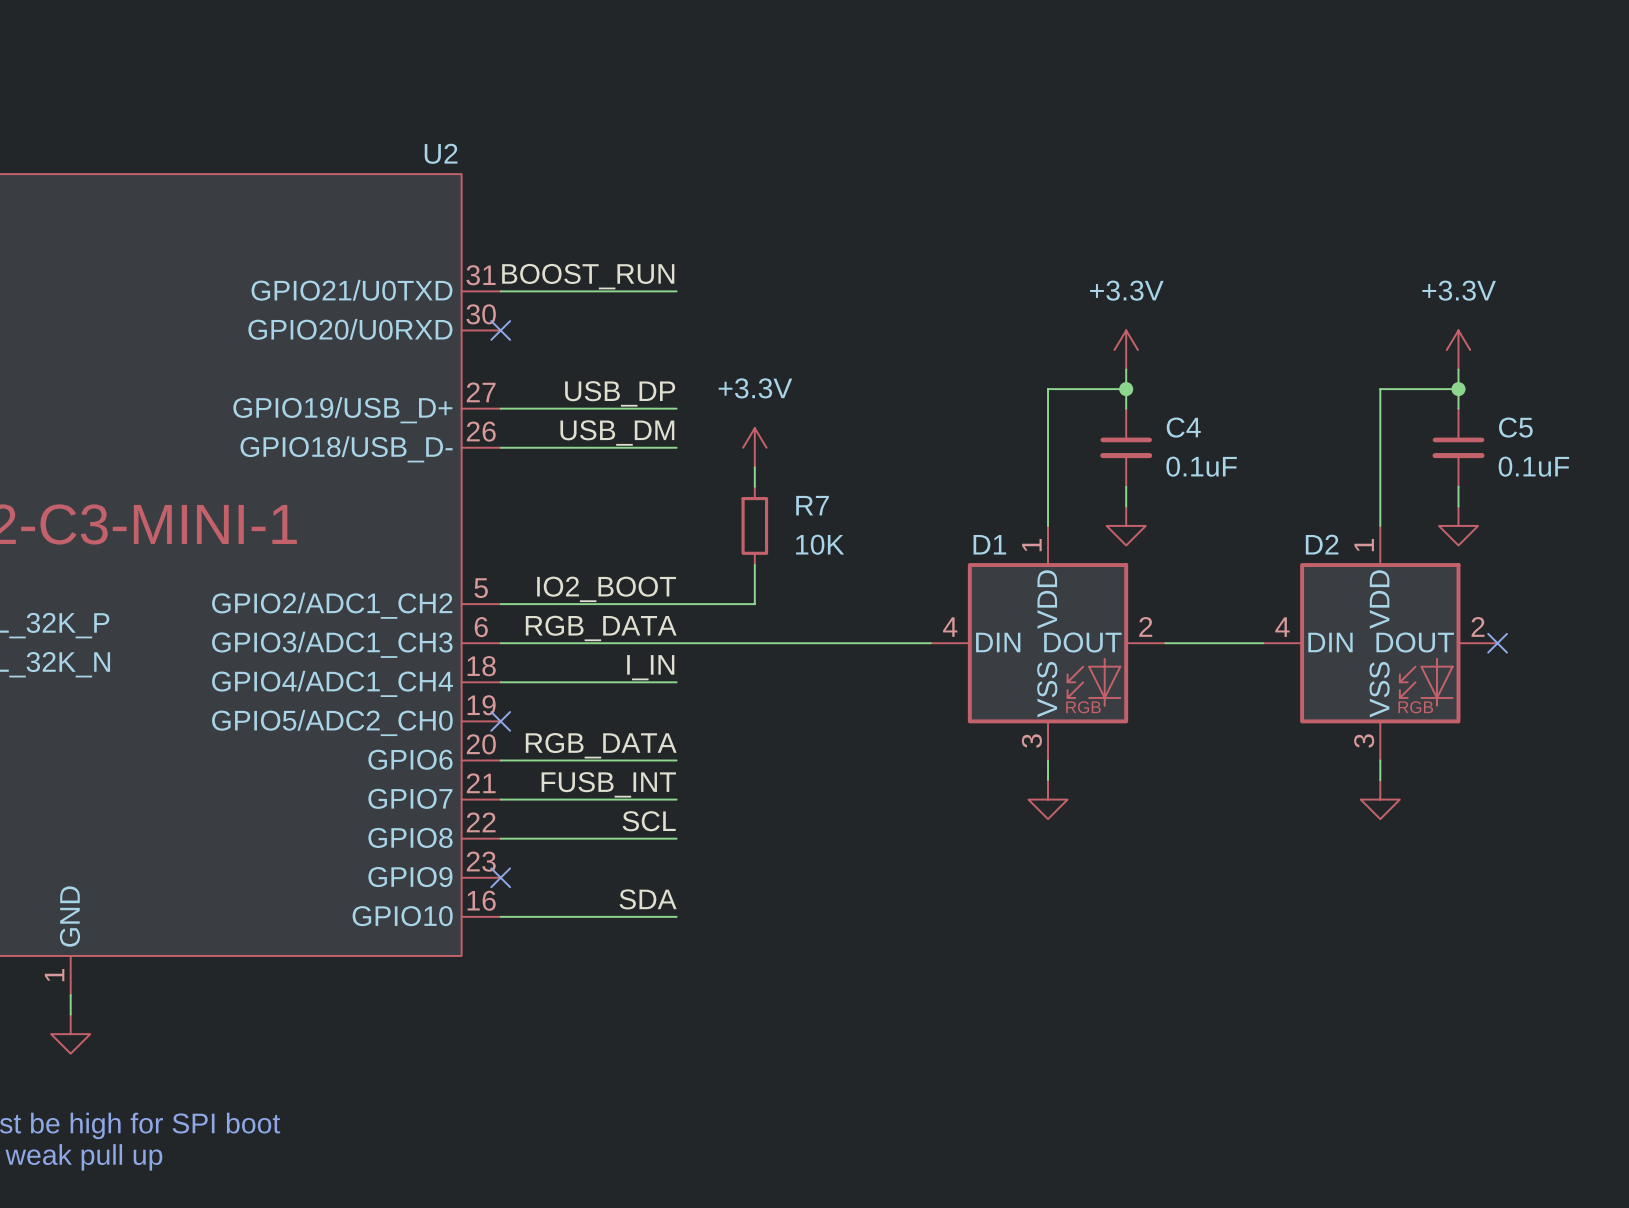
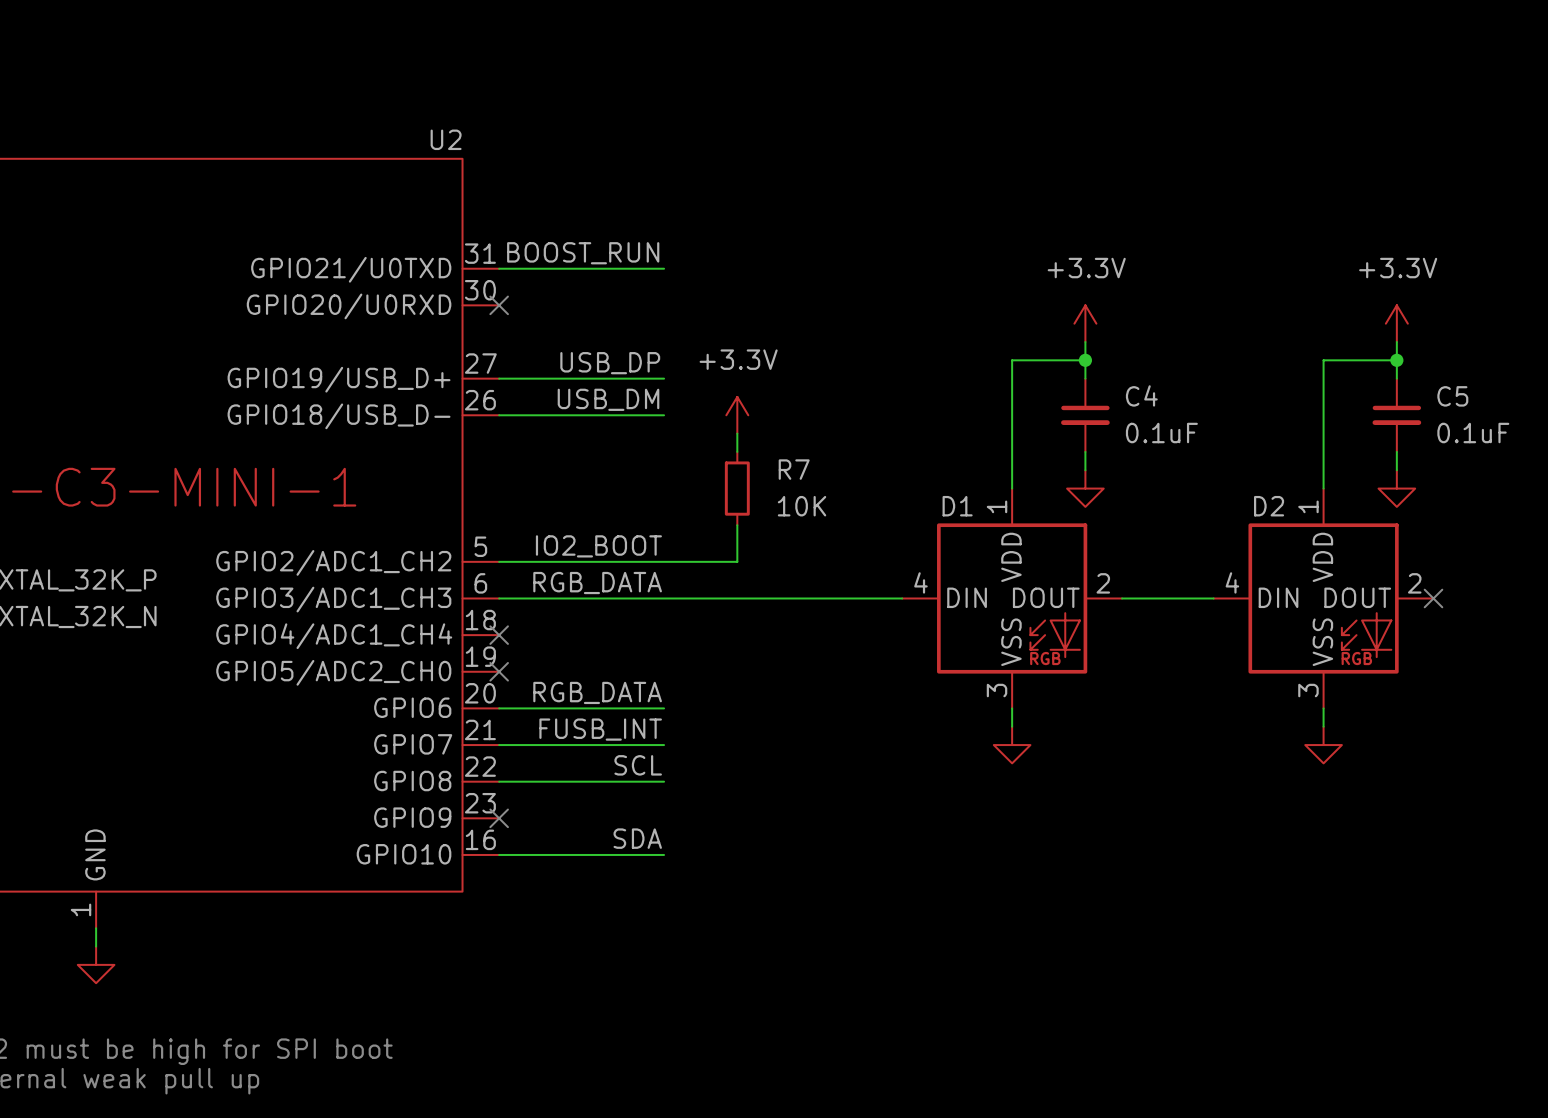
label: I_IN (650, 667) -> none
wire: (500, 682) (676, 682) -> none
no-connect mark: none -> (499, 635)

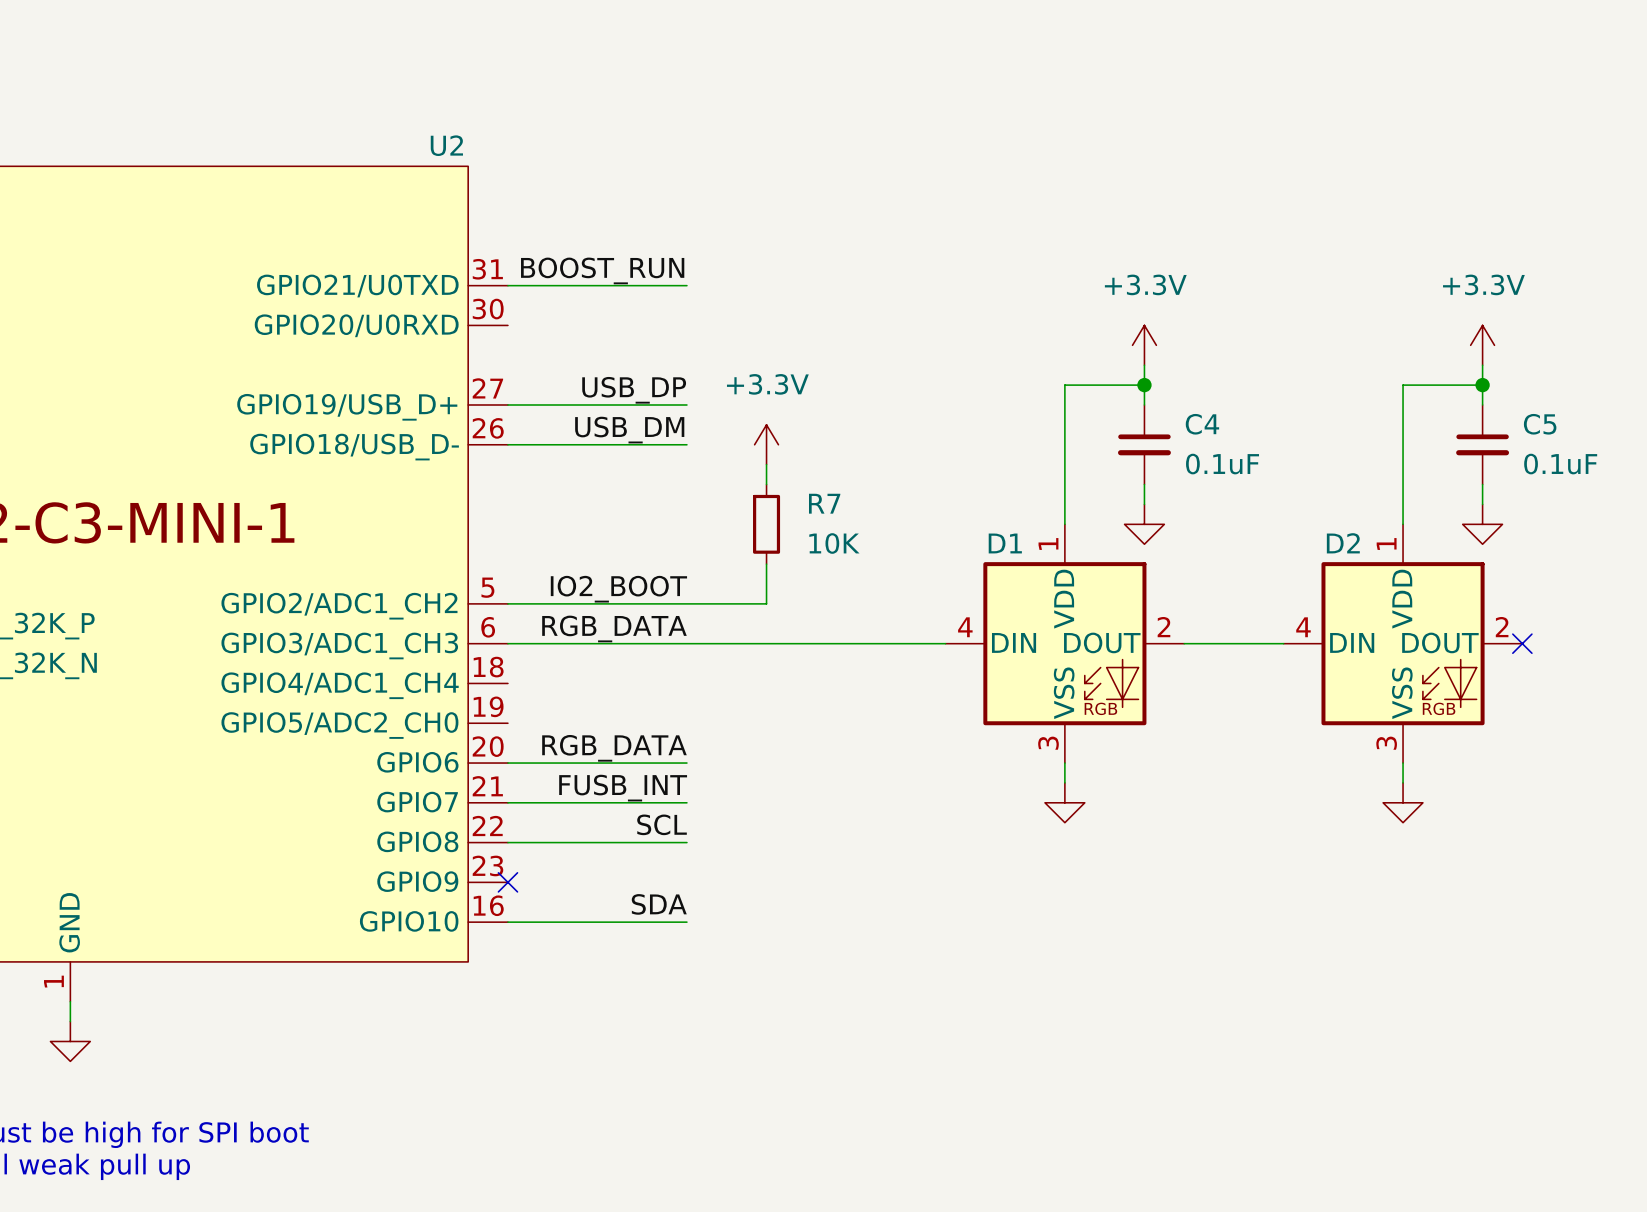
no-connect mark: (499, 305) -> none
no-connect mark: (499, 635) -> none
no-connect mark: (499, 671) -> none

